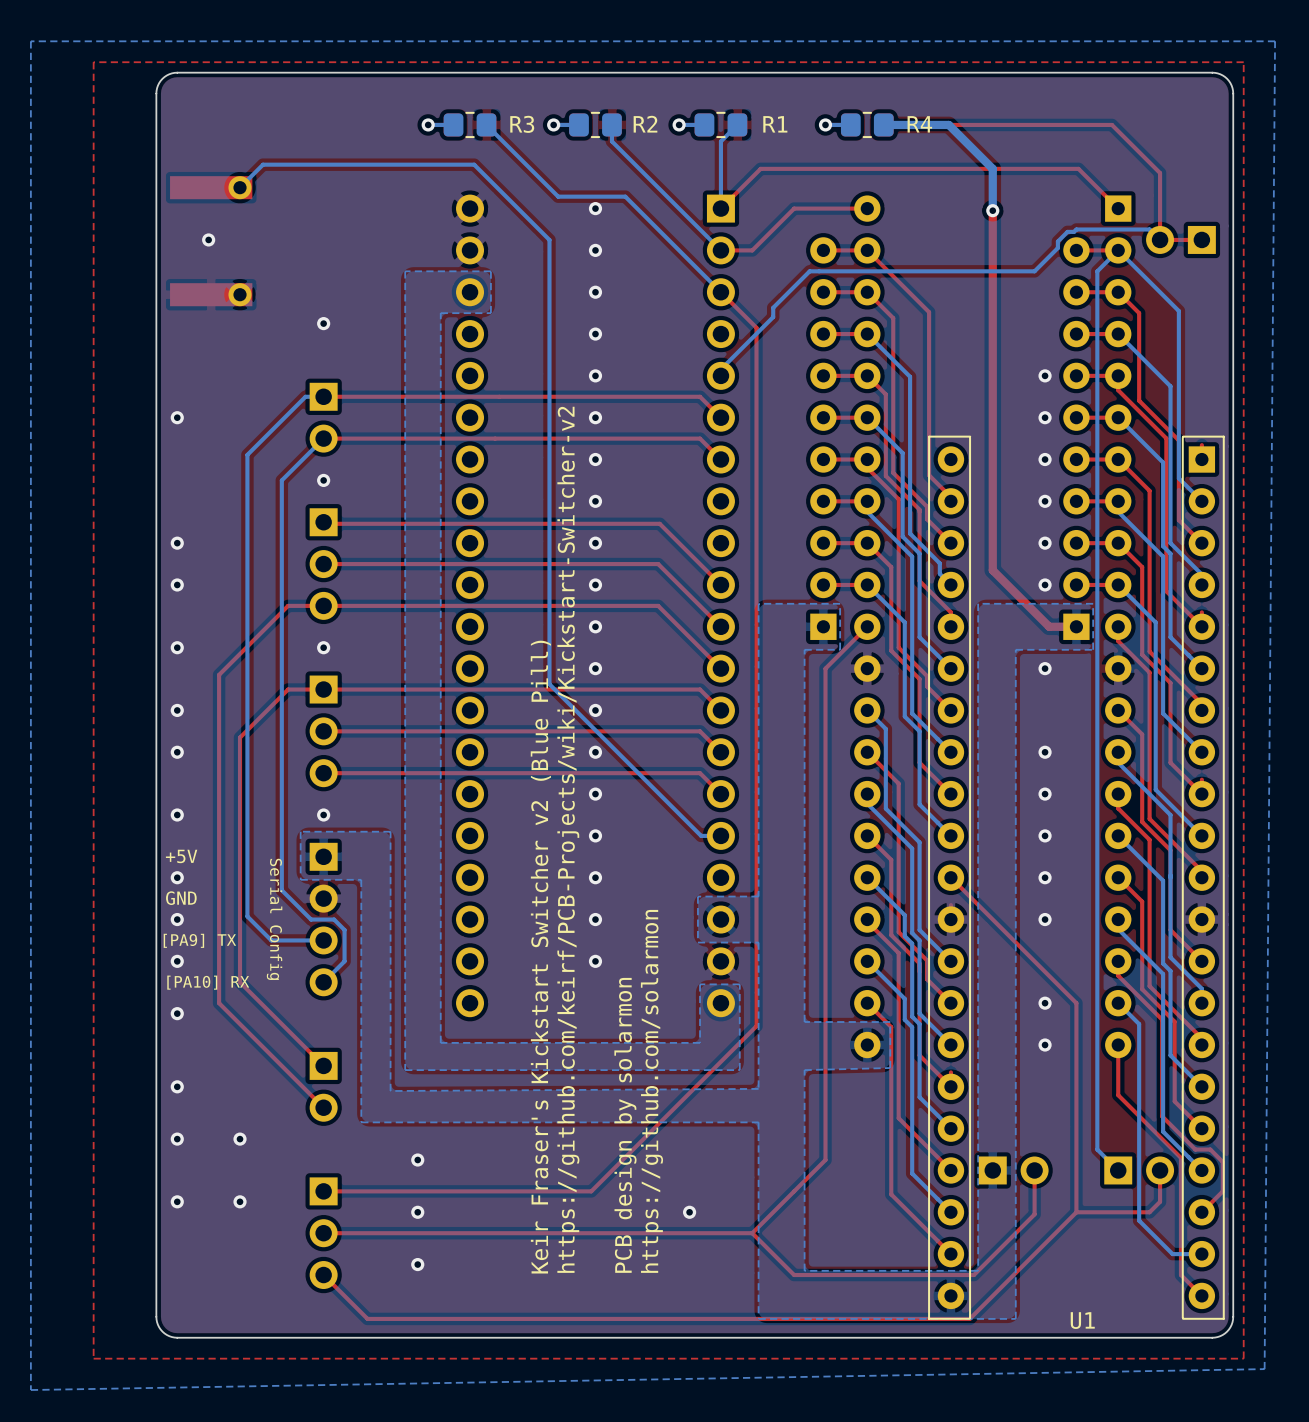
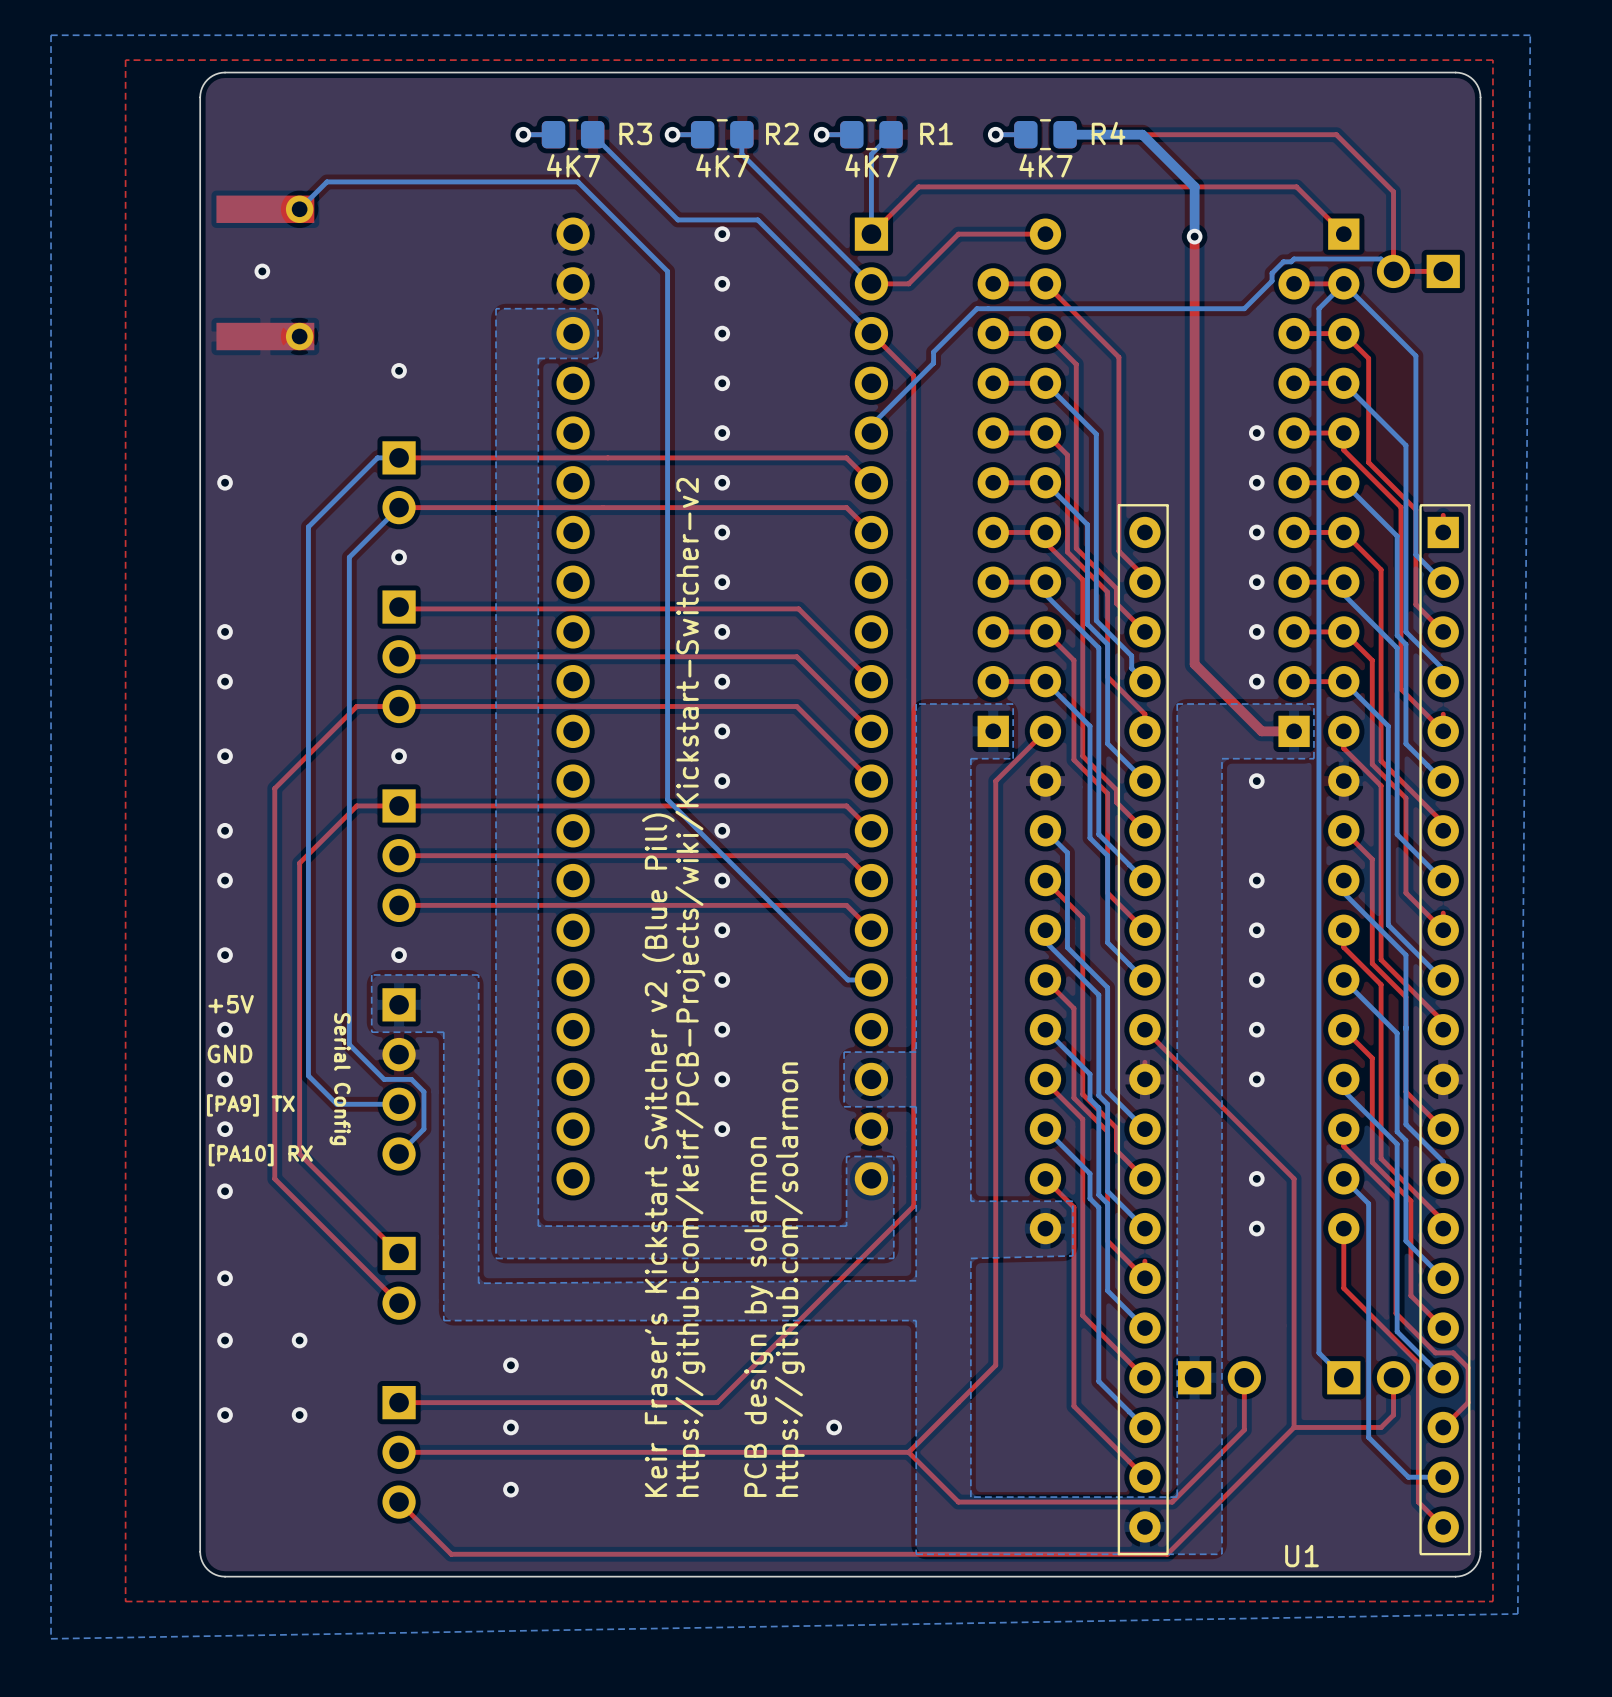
R3 value: none -> 4K7 (573, 165)
R2 value: none -> 4K7 (722, 165)
R1 value: none -> 4K7 (871, 165)
R4 value: none -> 4K7 (1045, 165)

